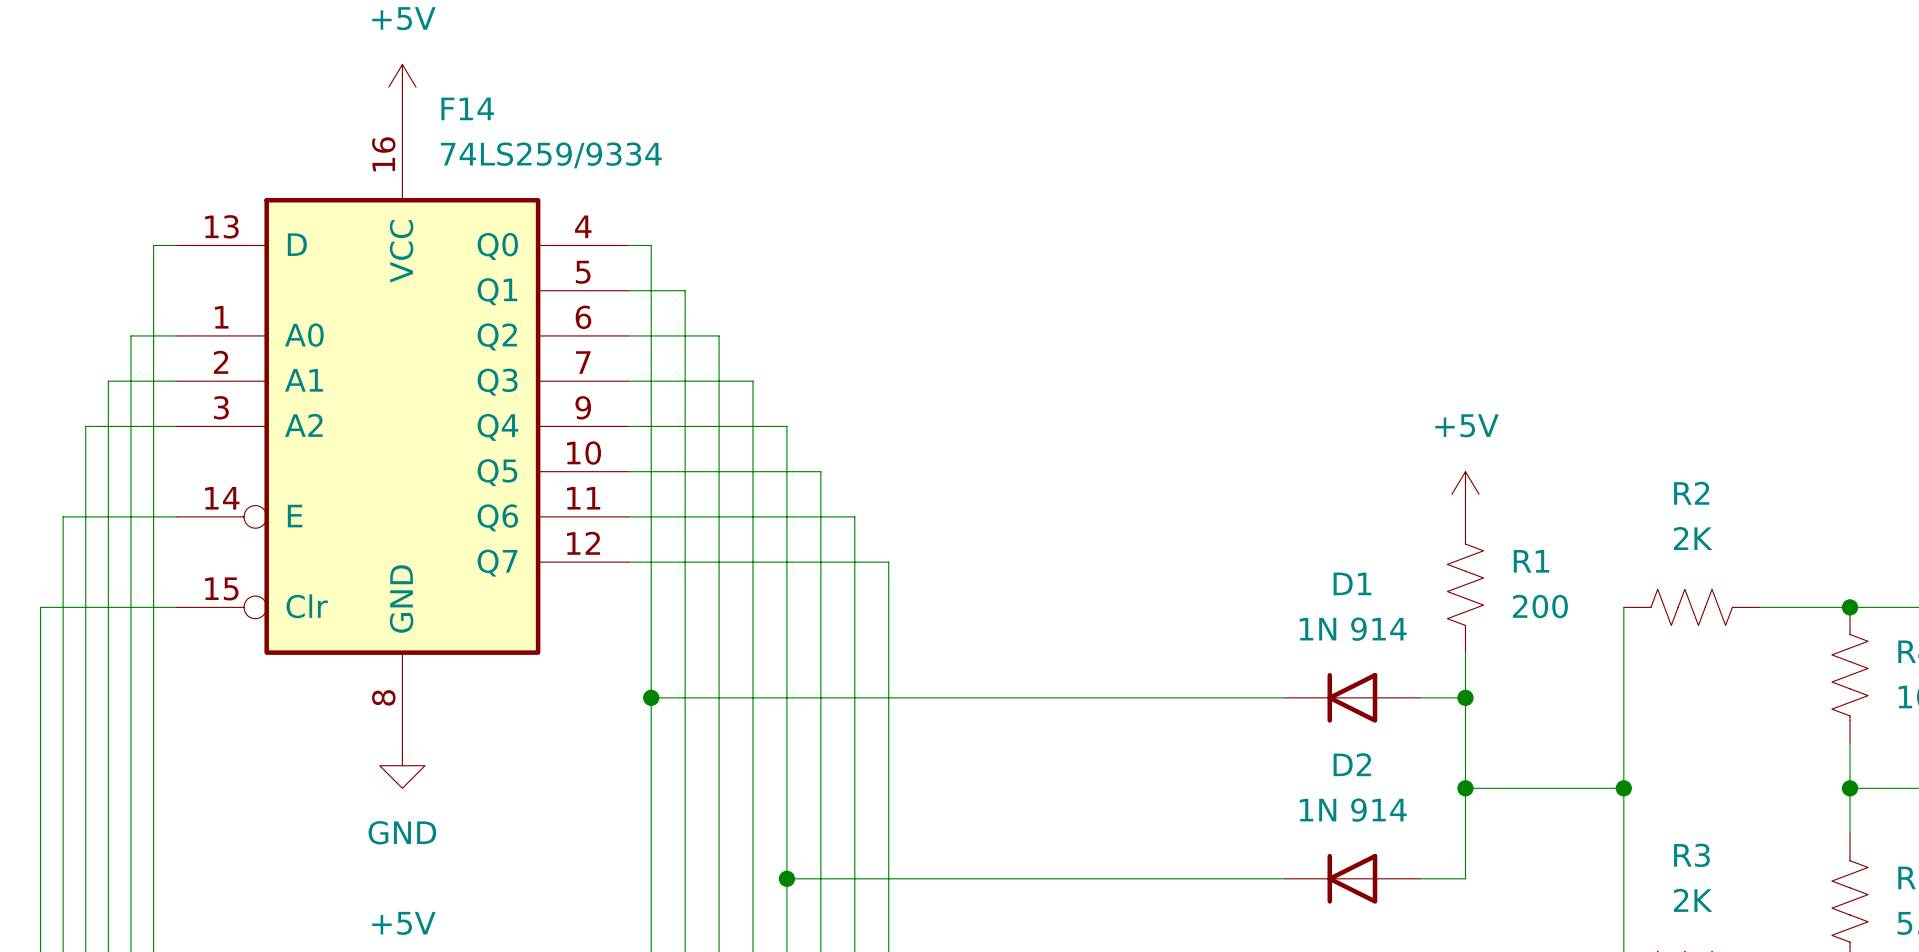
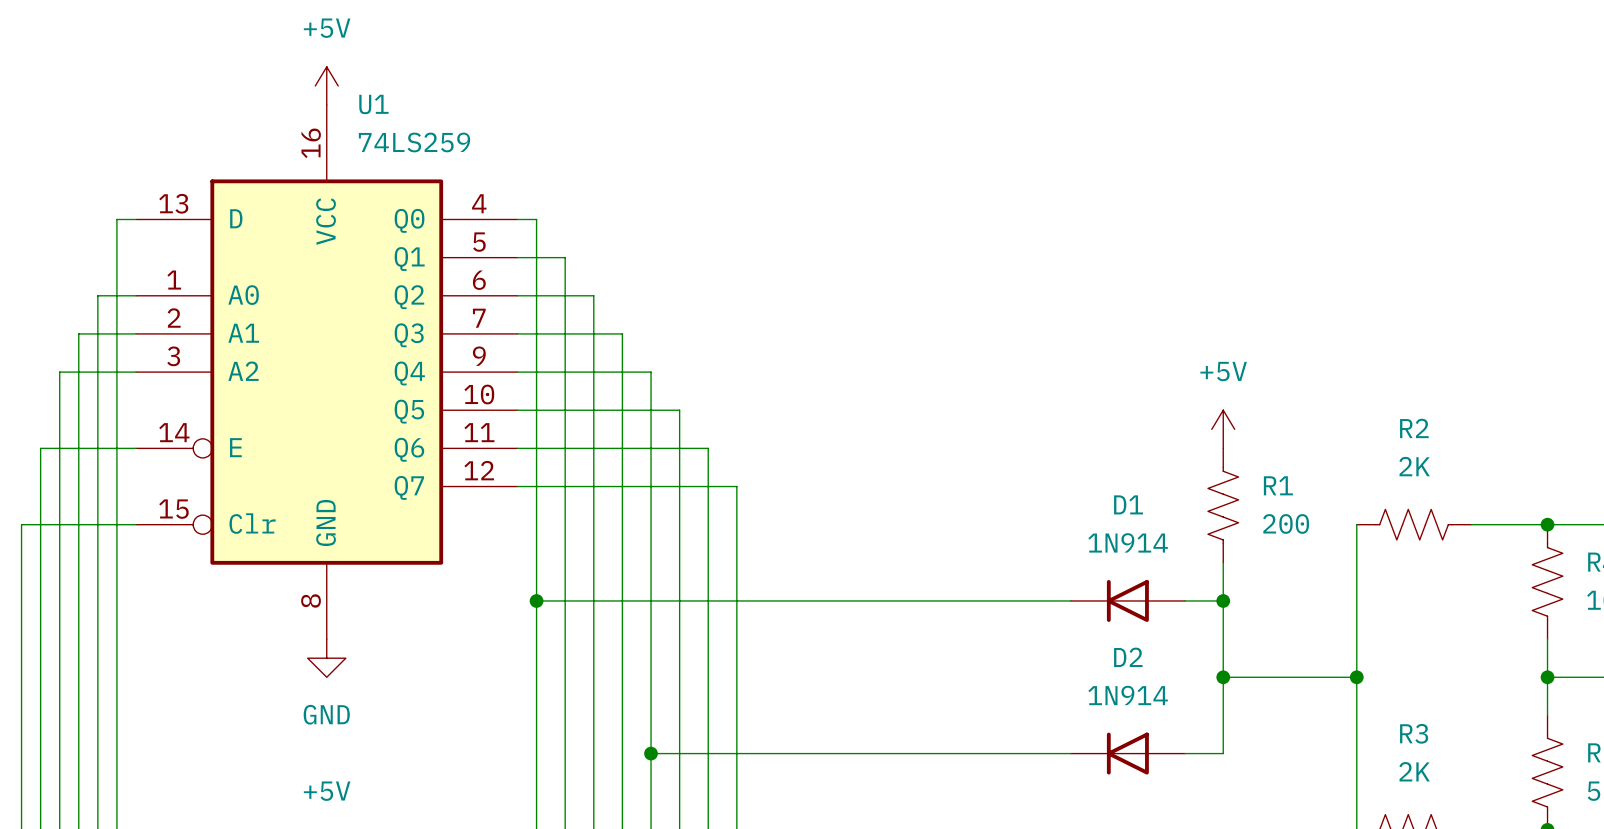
F14 name: F14 (467, 108) -> U1 (373, 104)
F14 value: 74LS259/9334 (551, 155) -> 74LS259 (414, 142)
D1 value: 1N 914 (1353, 629) -> 1N914 (1128, 542)
D2 value: 1N 914 (1353, 810) -> 1N914 (1128, 695)

